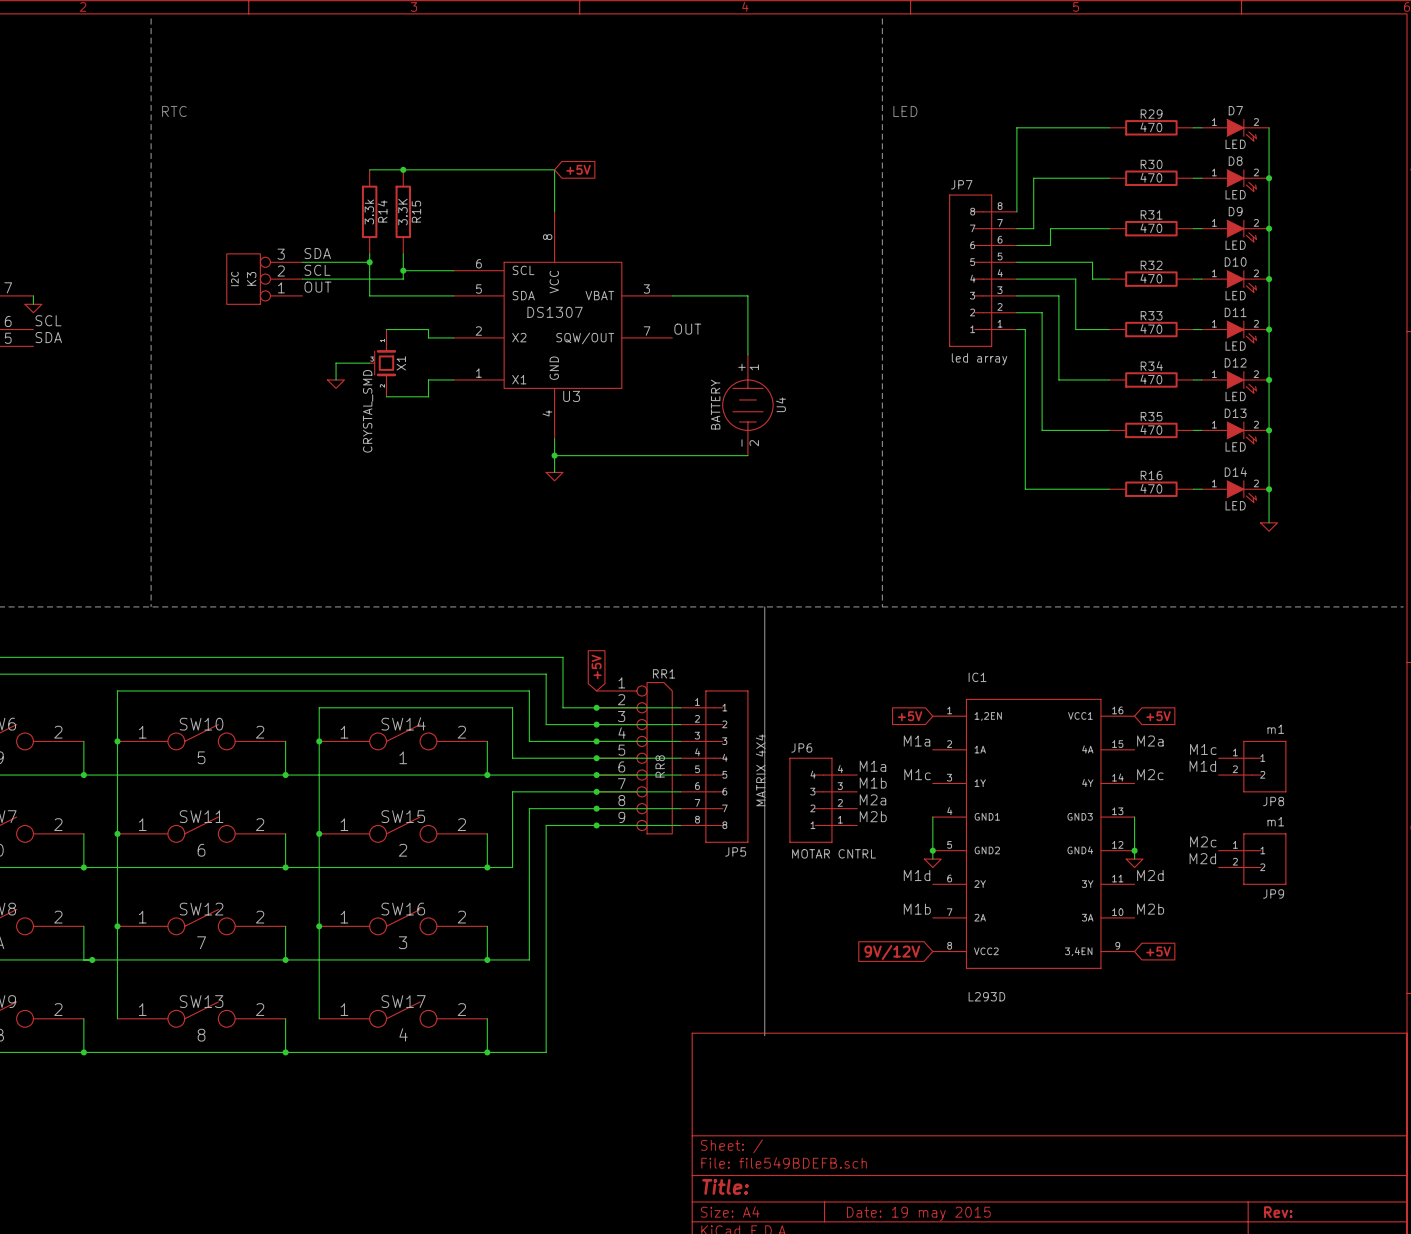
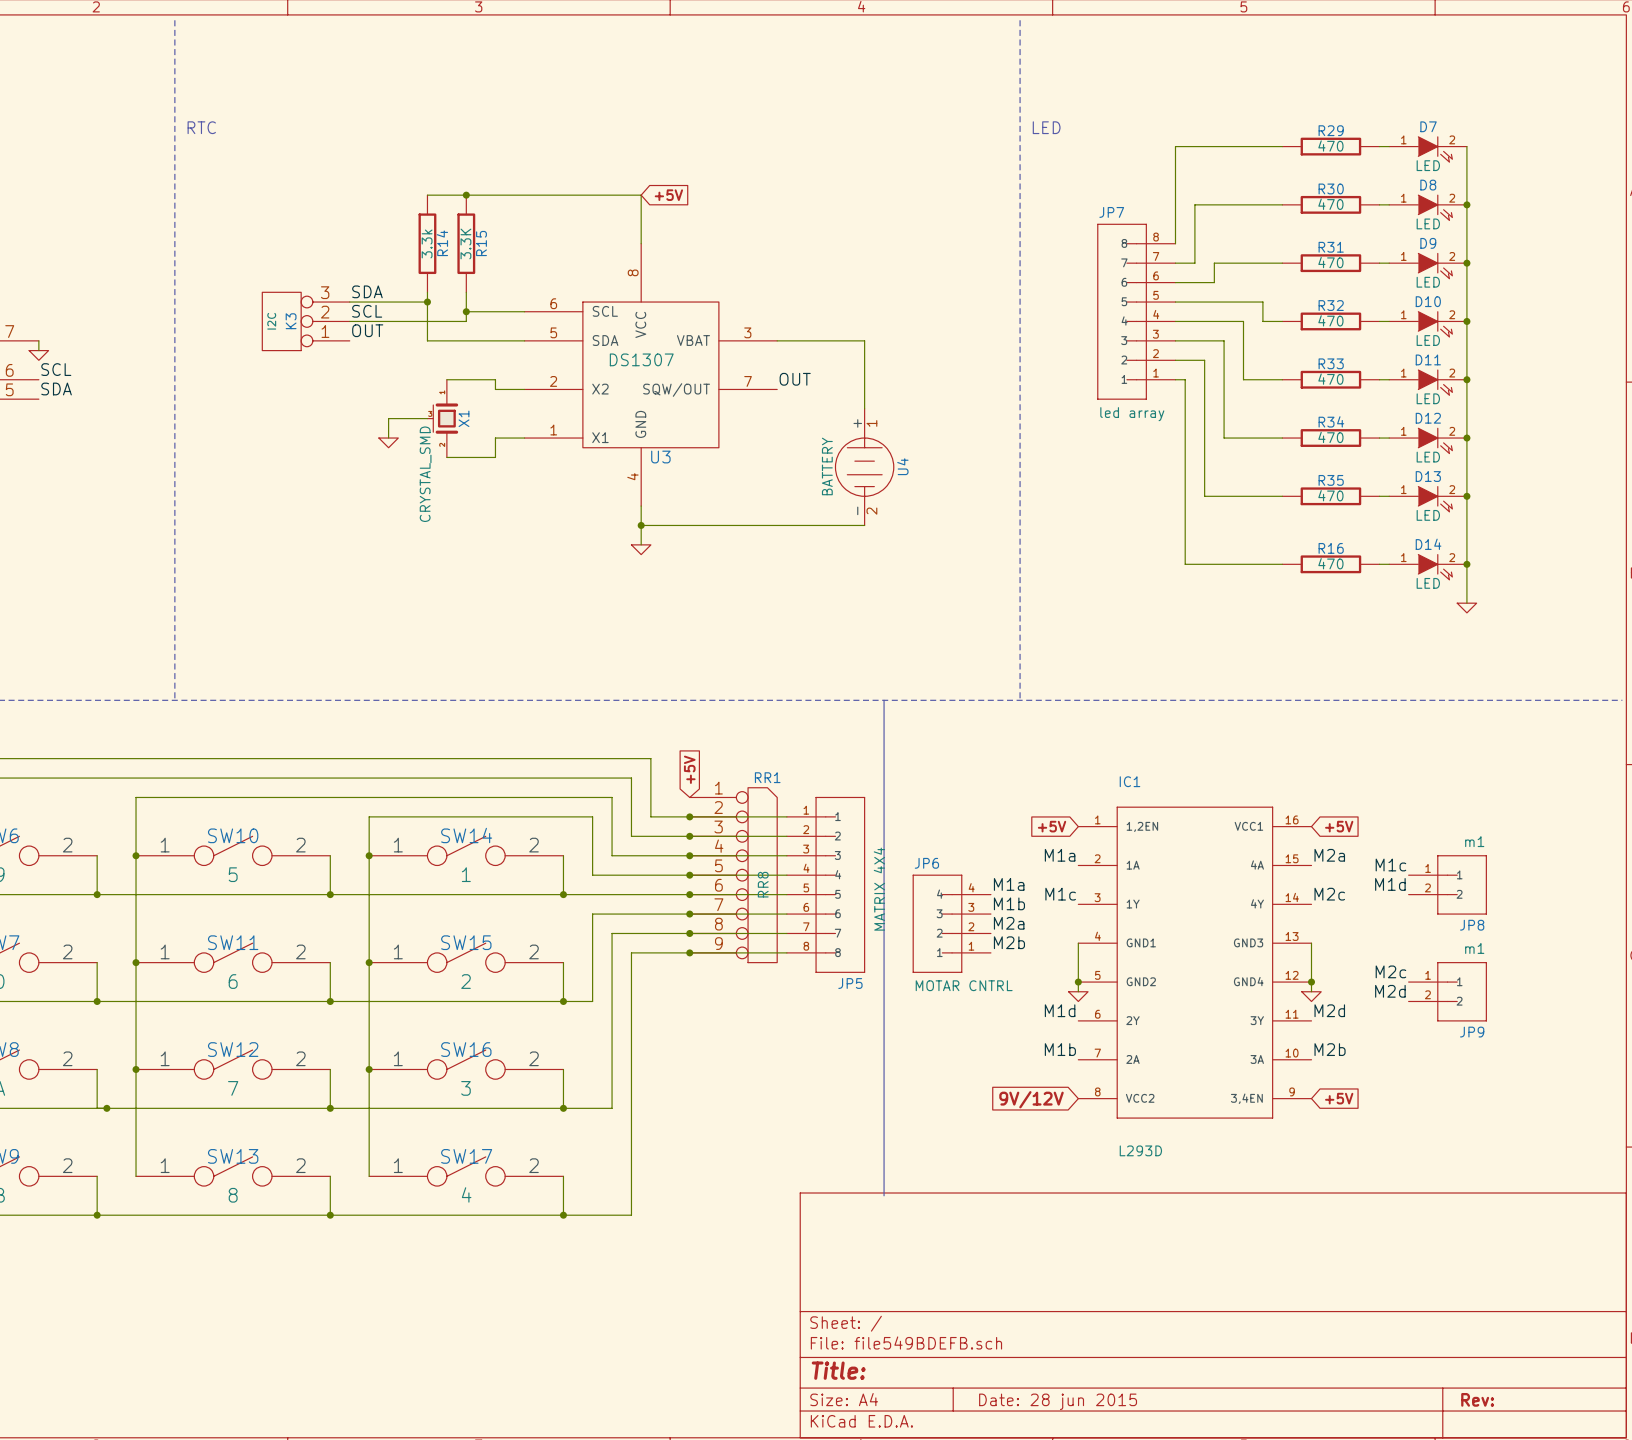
title block: Date: 19 may 2015 (918, 1213) -> Date: 28 jun 2015 (1058, 1401)

